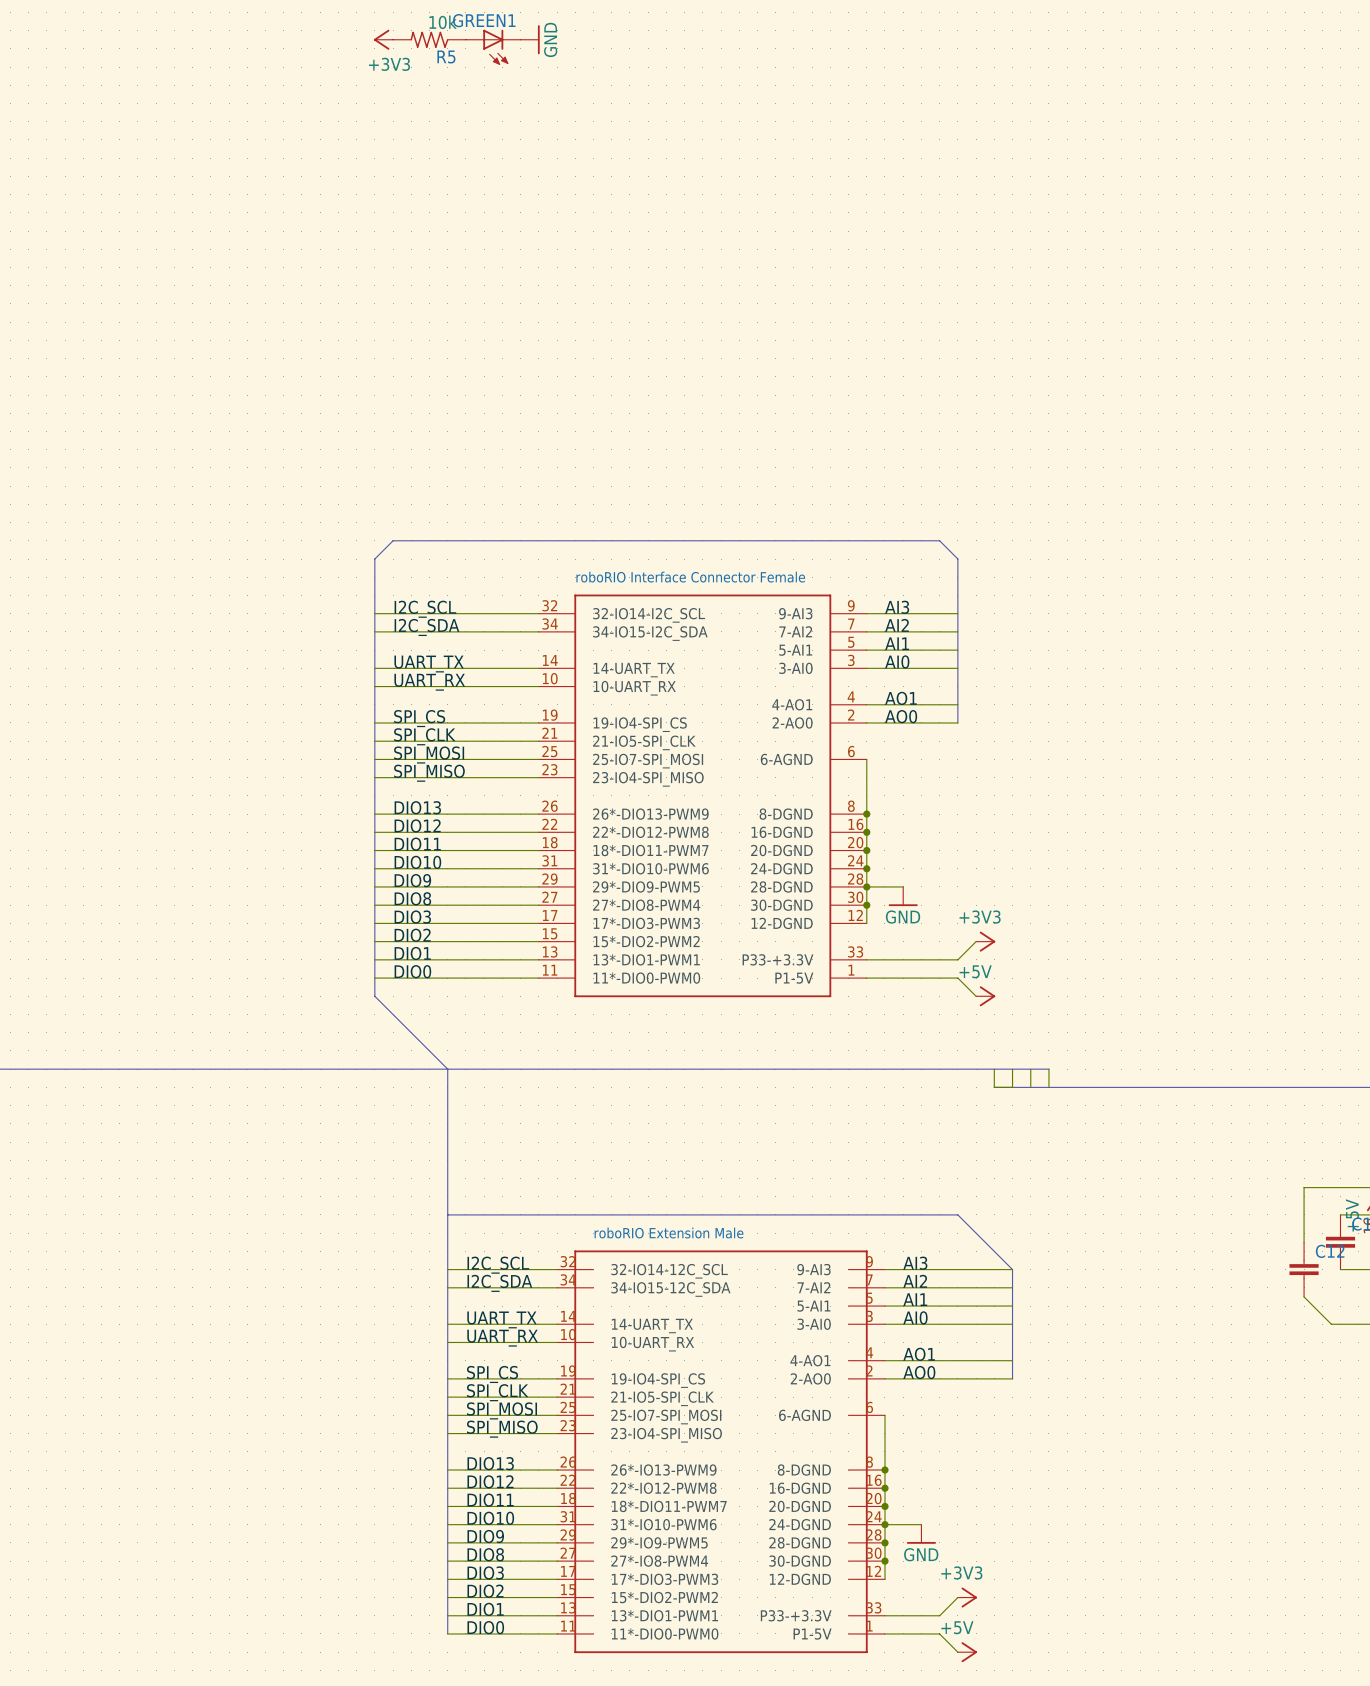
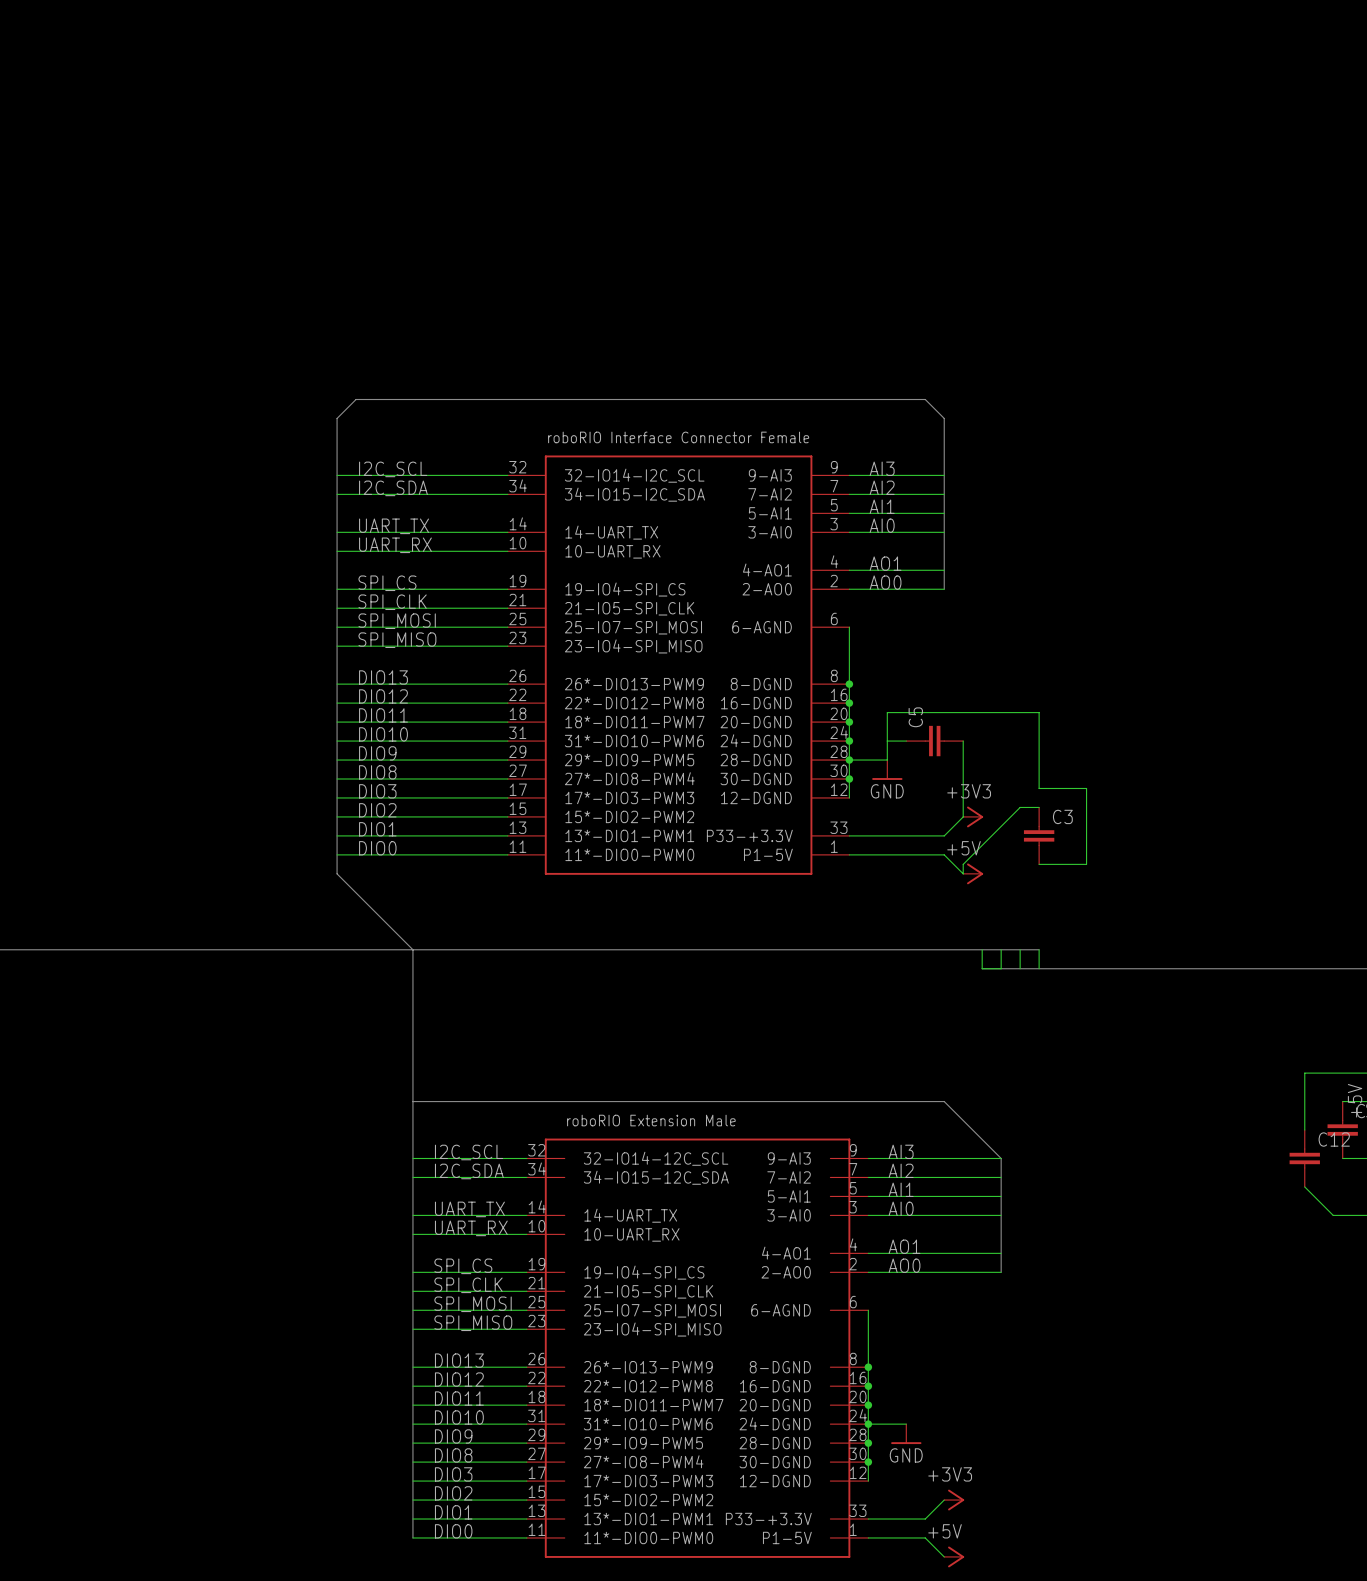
wire: none -> (887, 741) (906, 741)
C5: none -> (934, 741)
wire: none -> (963, 741) (963, 816)
wire: none -> (887, 760) (887, 712) (1039, 712) (1039, 788) (1086, 788) (1086, 864) (1039, 864)
wire: none -> (1039, 807) (1020, 807) (963, 864) (963, 873)
C3: none -> (1039, 835)

